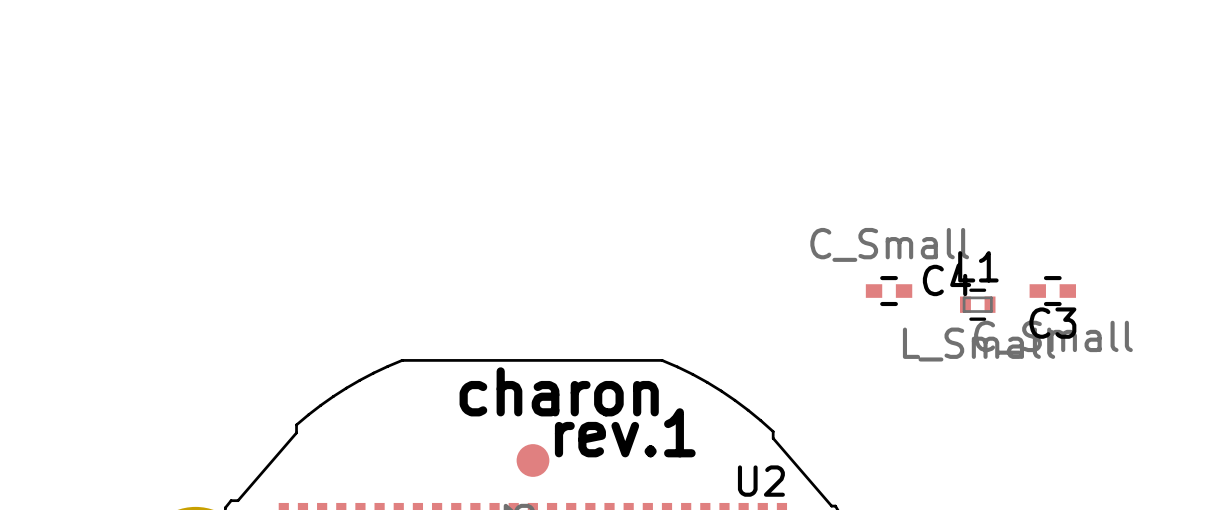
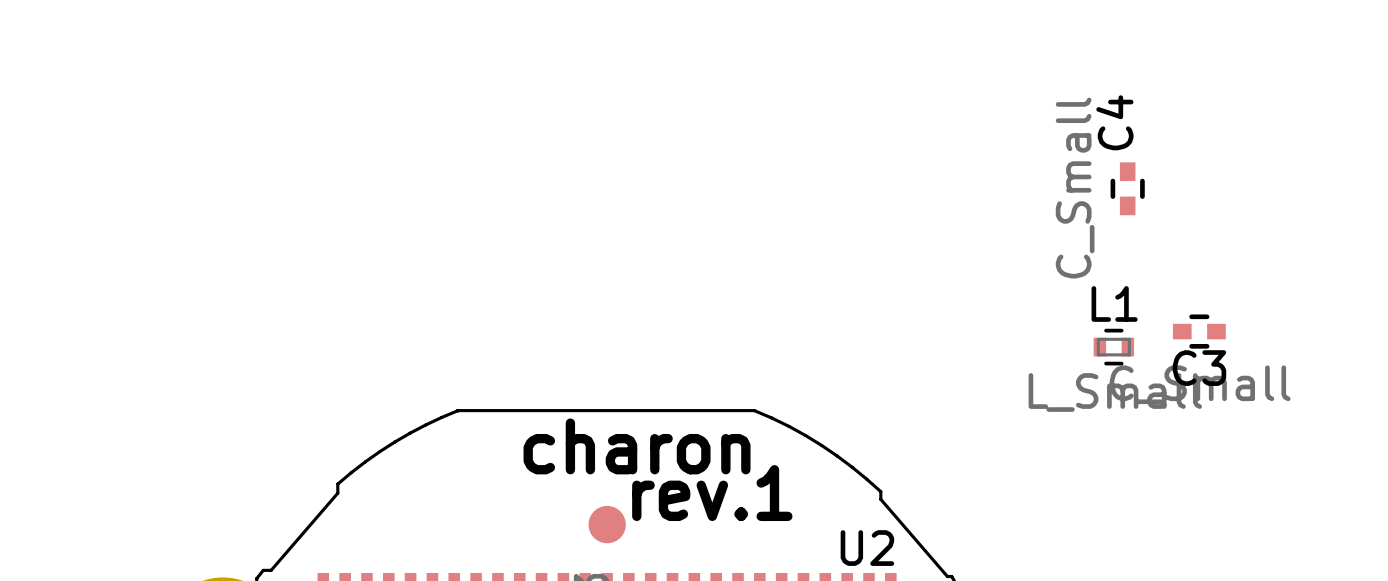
C4 value position: C_Small (889, 244) -> C_Small (1075, 188)
C4 name position: C4 (947, 279) -> C4 (1114, 122)
C4 rotation: 0° (889, 291) -> 90° clockwise (1127, 188)
C4 position: (889, 291) -> (1127, 188)

